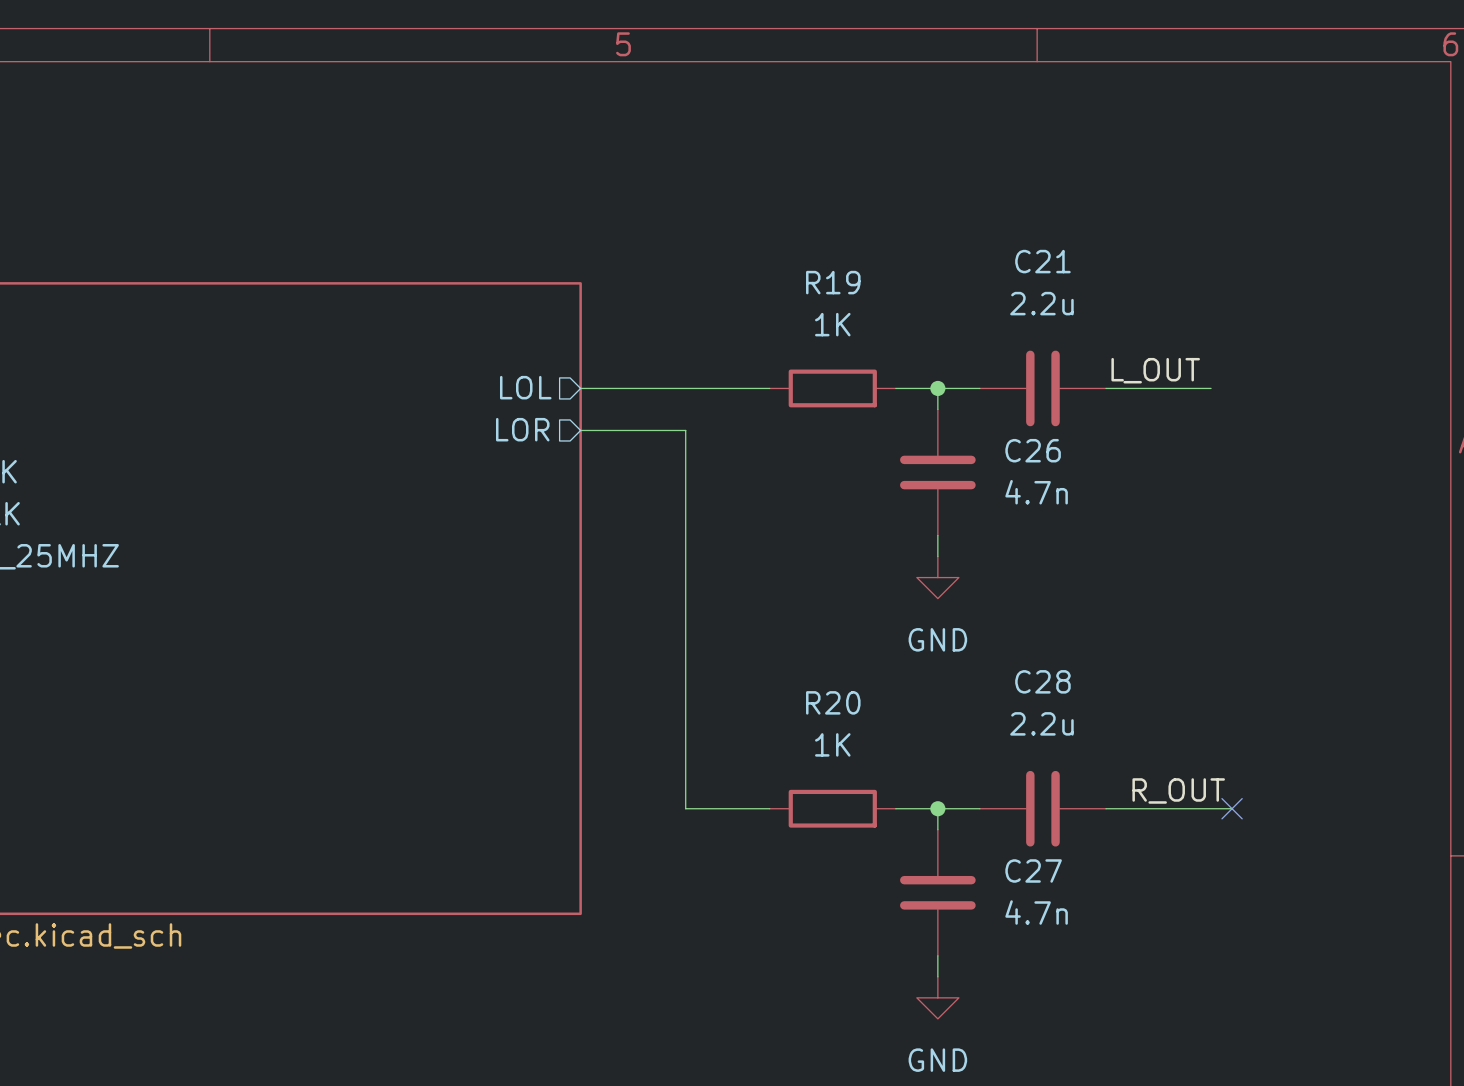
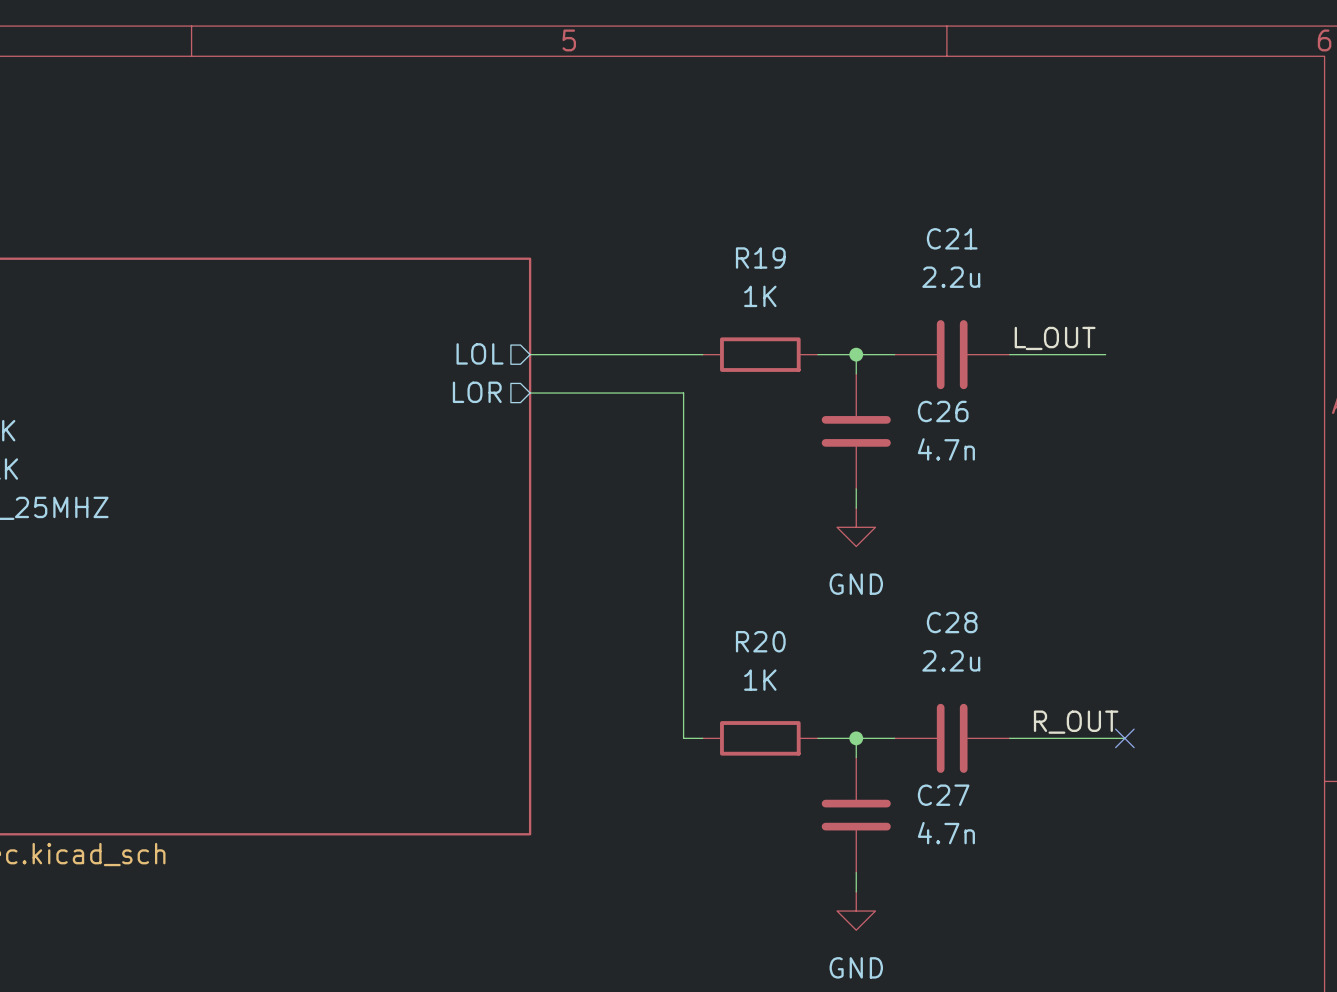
wire: (685, 430) (685, 808) (748, 808) -> (626, 393) (683, 393) (683, 738)

